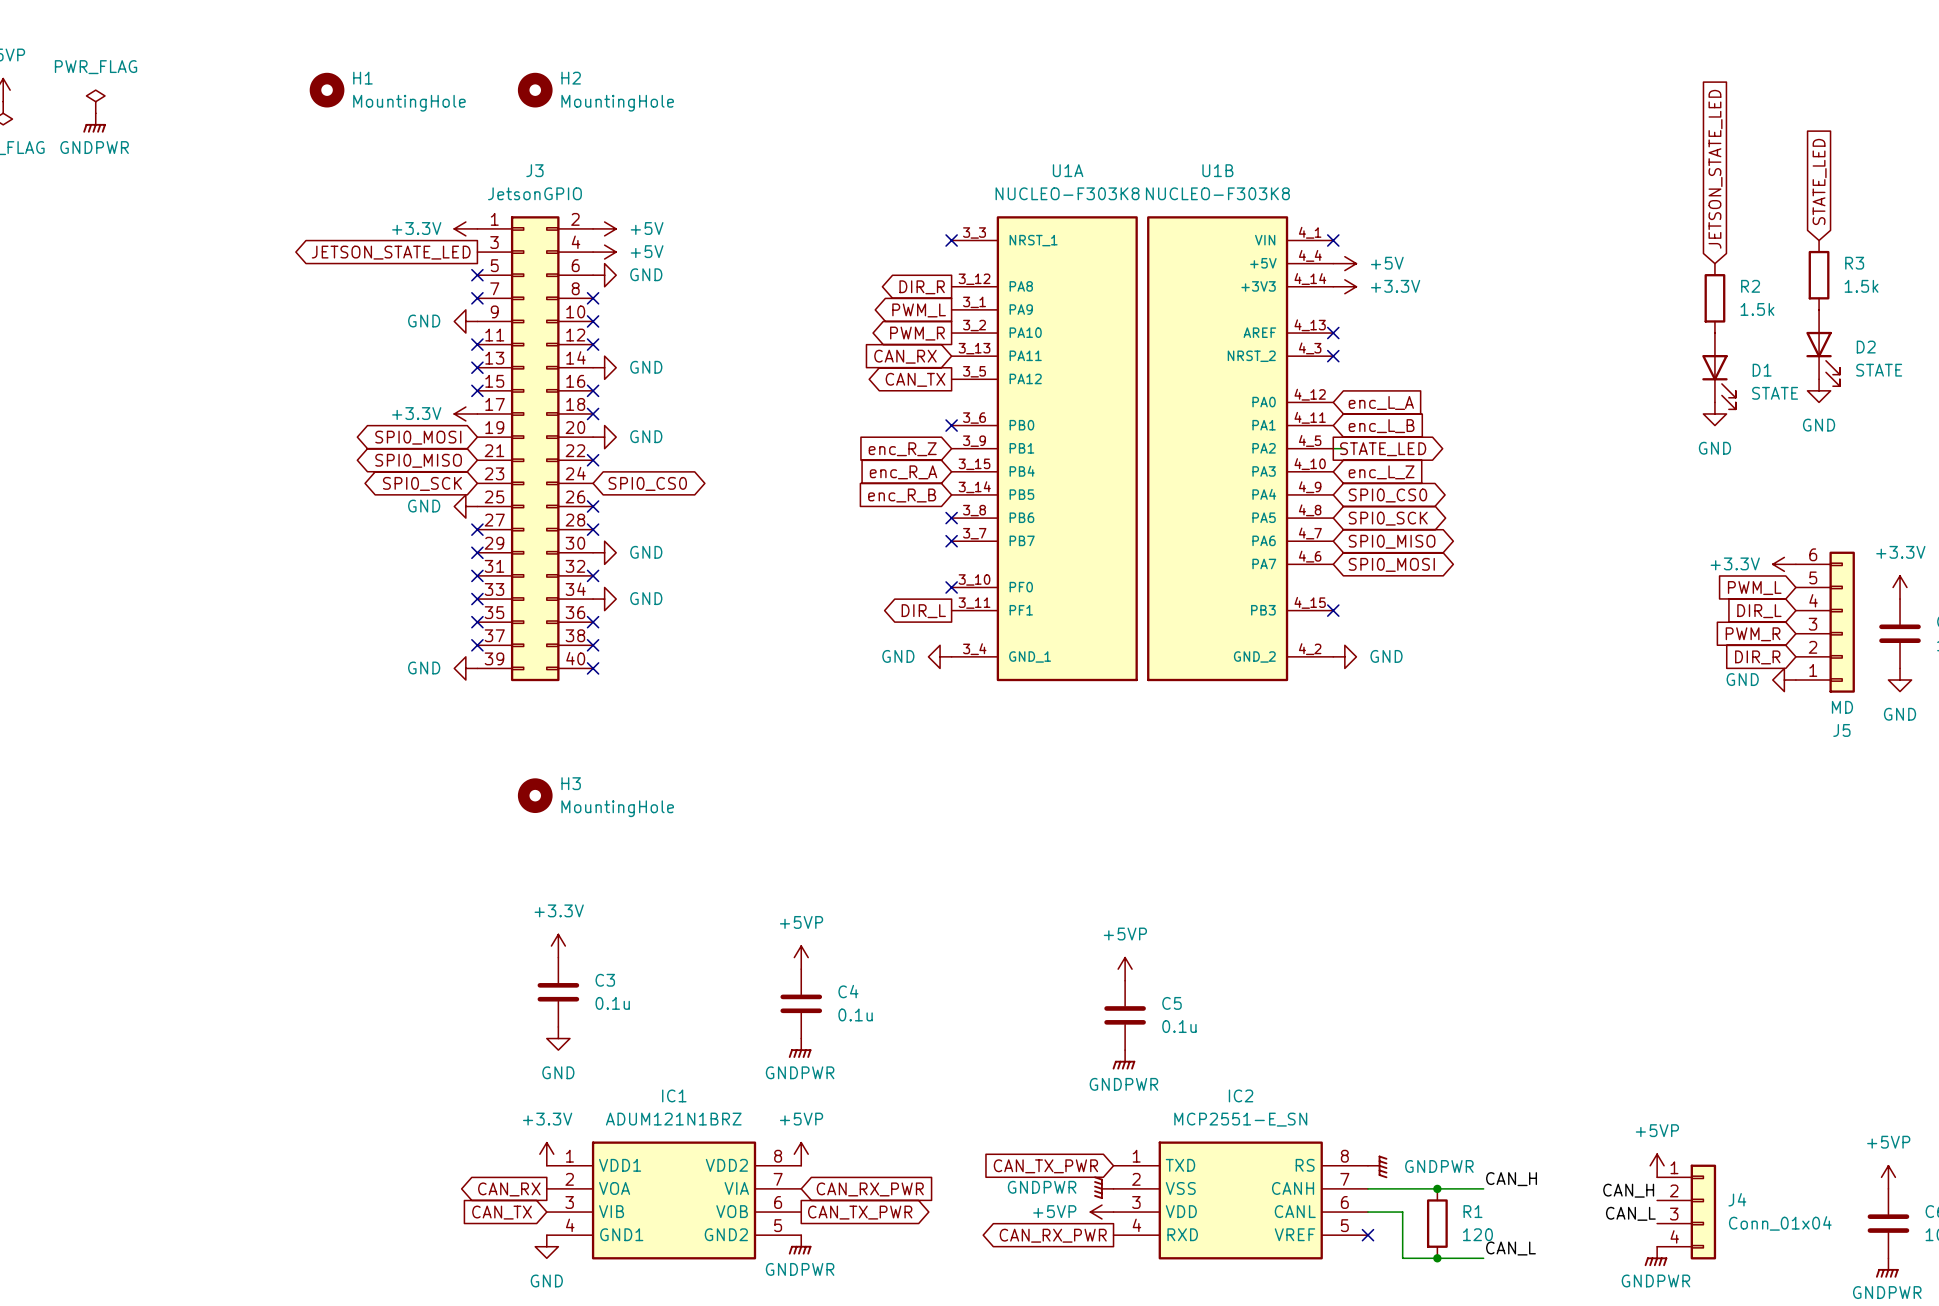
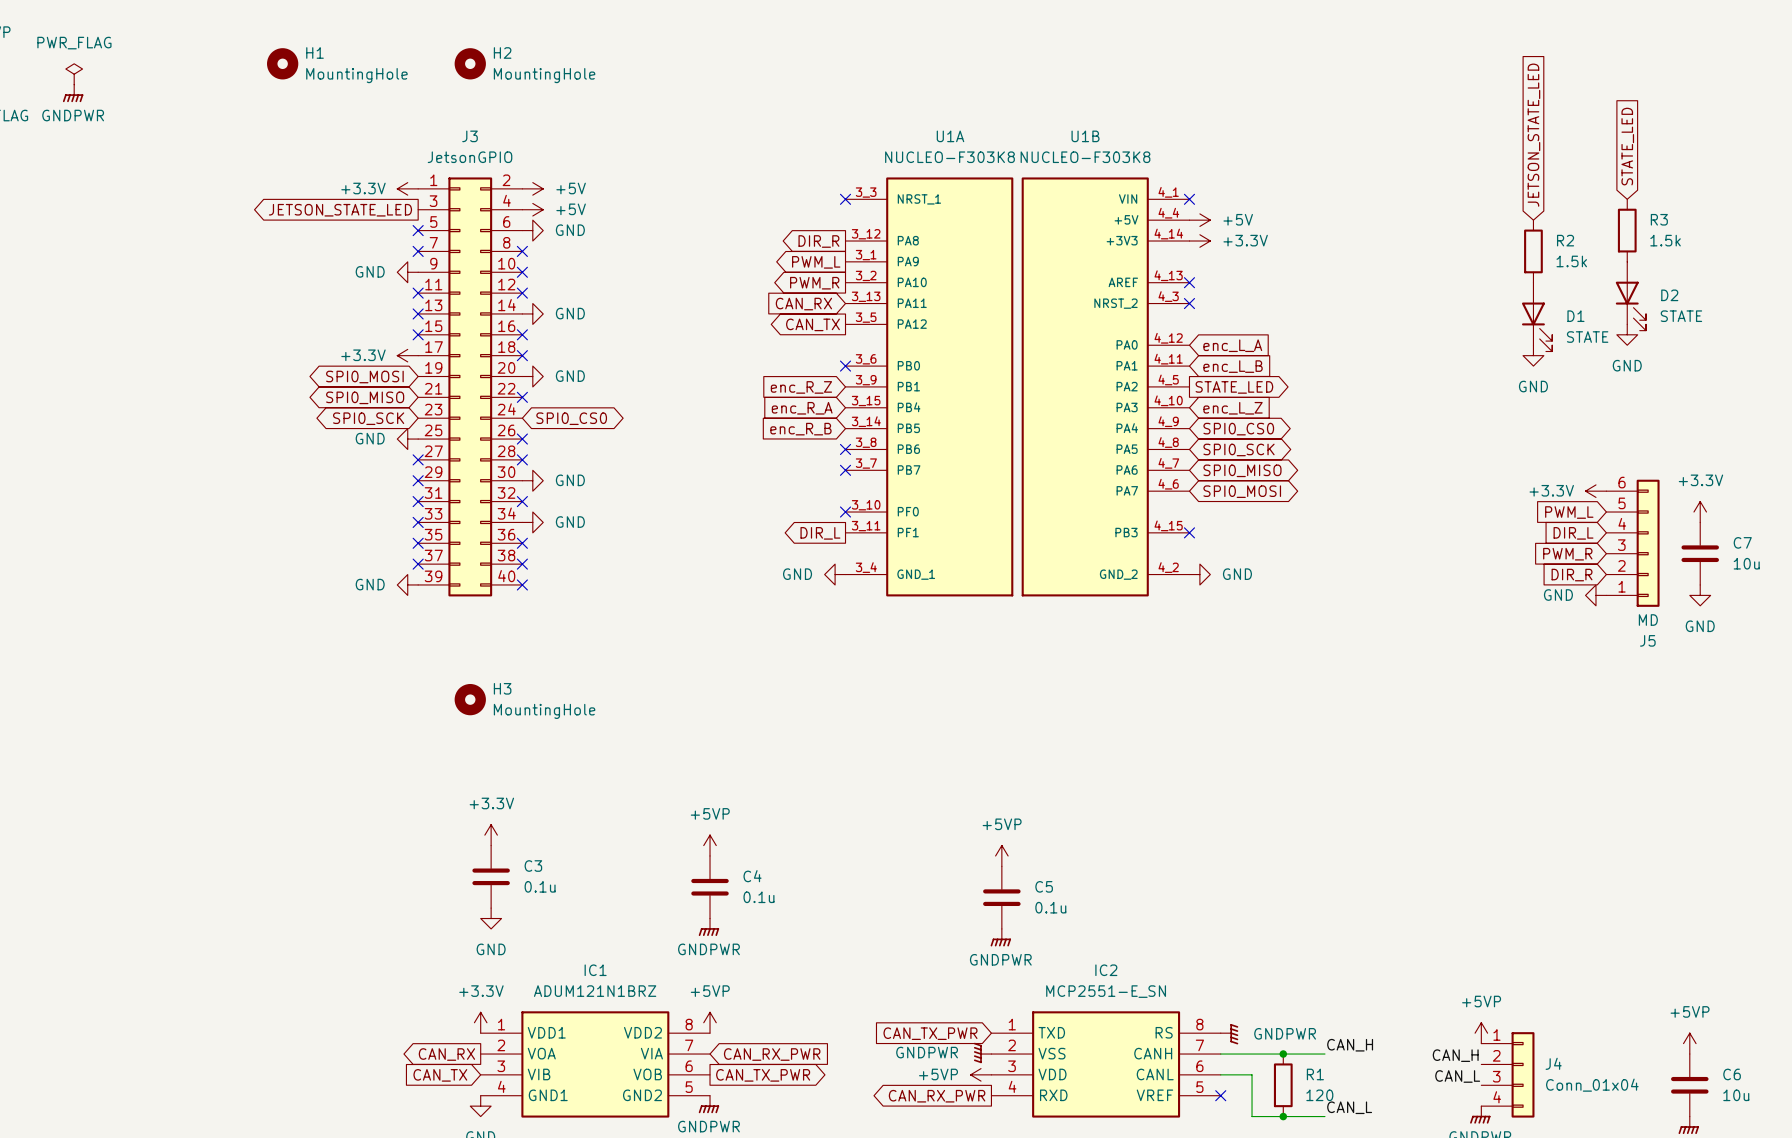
wire: (1333, 448) (1344, 448) -> none

